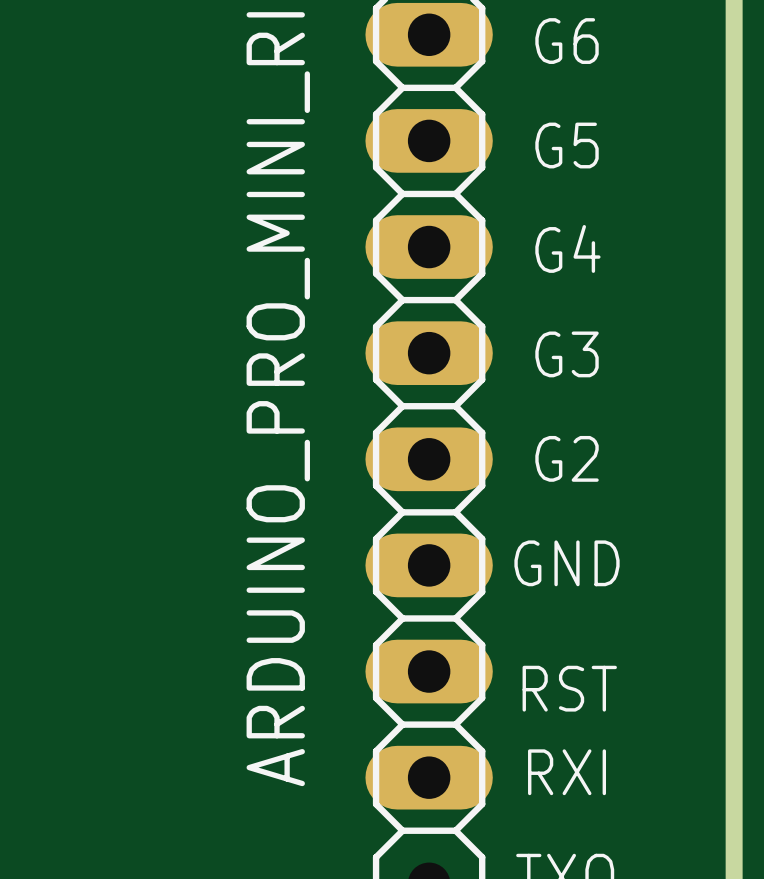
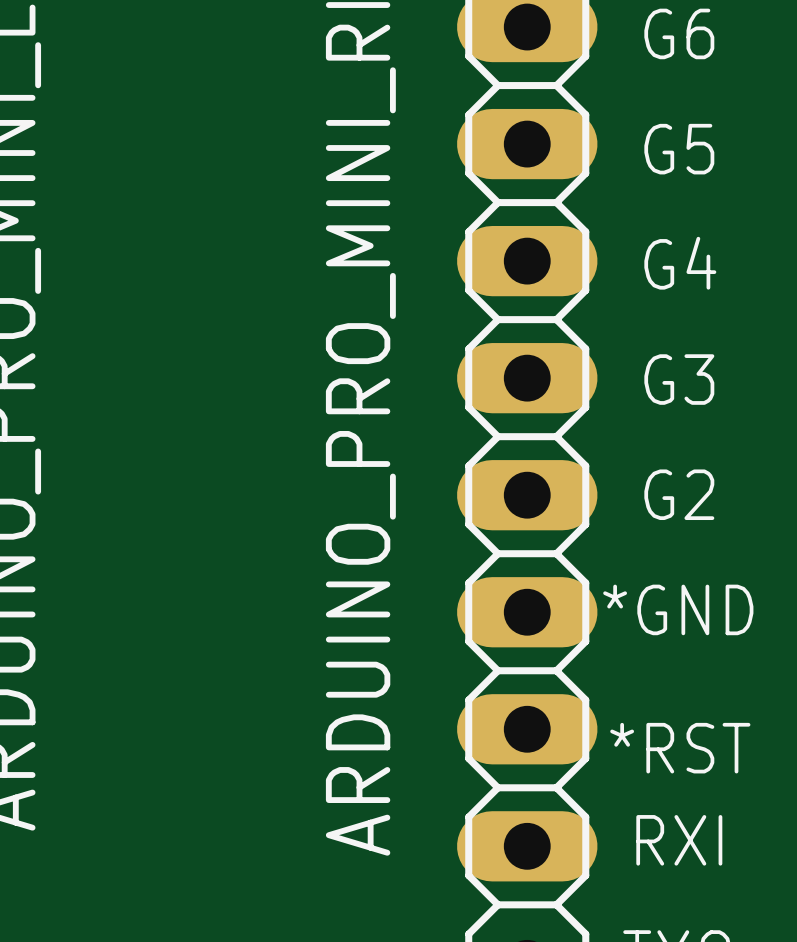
text: GND (567, 563) -> *GND (678, 609)
text: RST (569, 688) -> *RST (680, 748)

